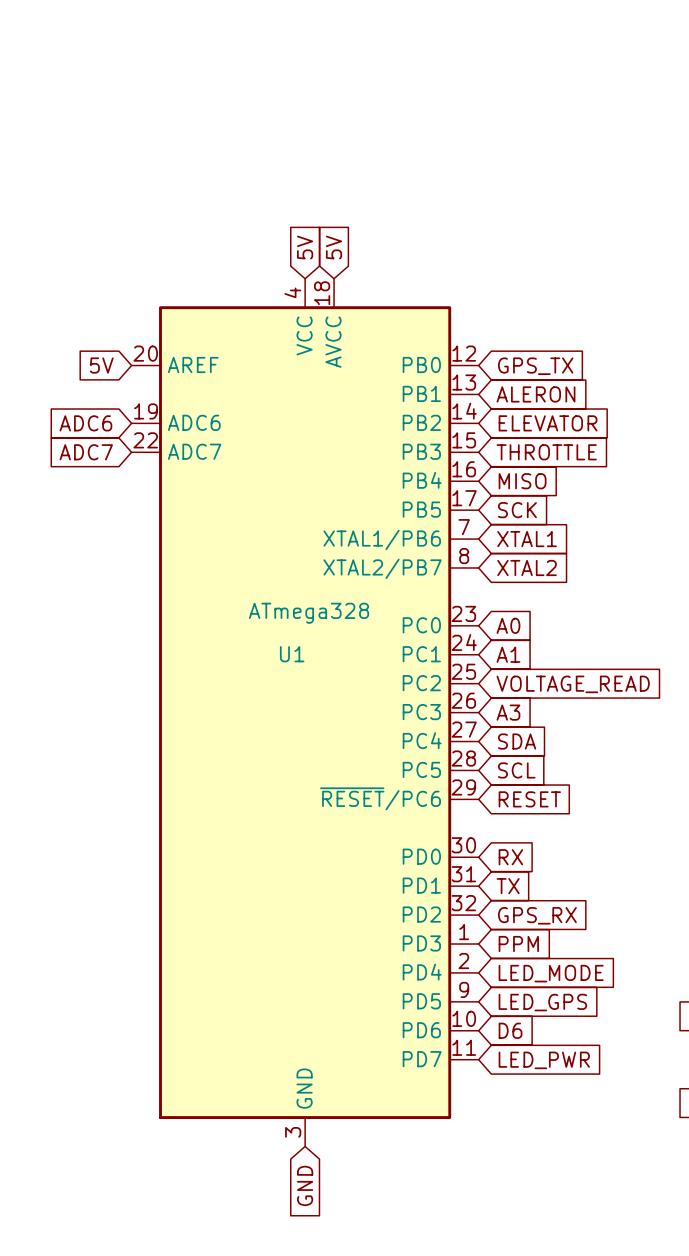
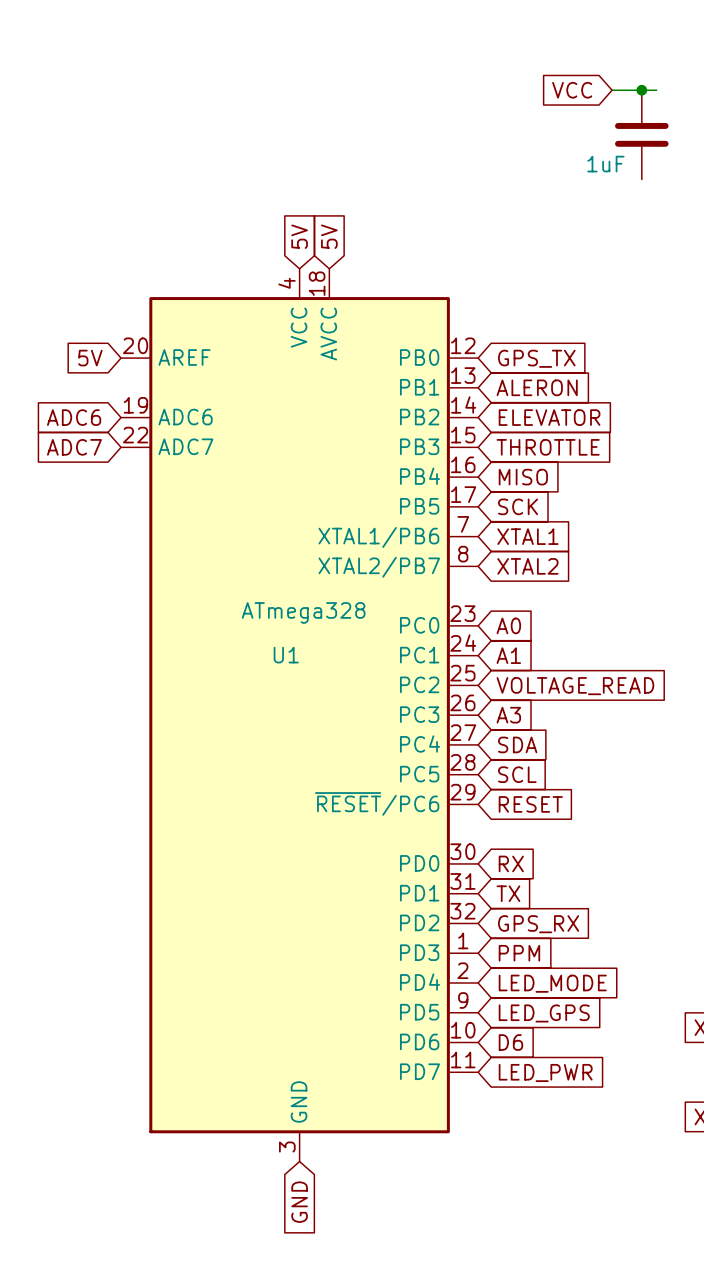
global label: none -> VCC (572, 90)
wire: none -> (612, 90) (656, 90)
junction: none -> (641, 90)
part: none -> 1uF (641, 134)

